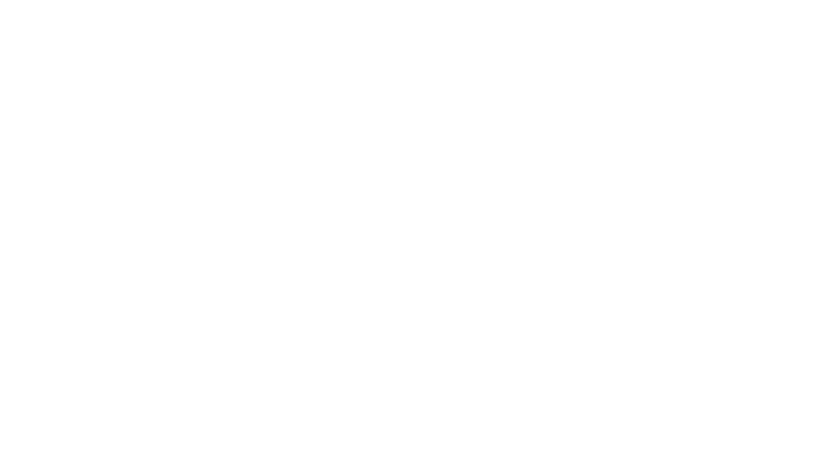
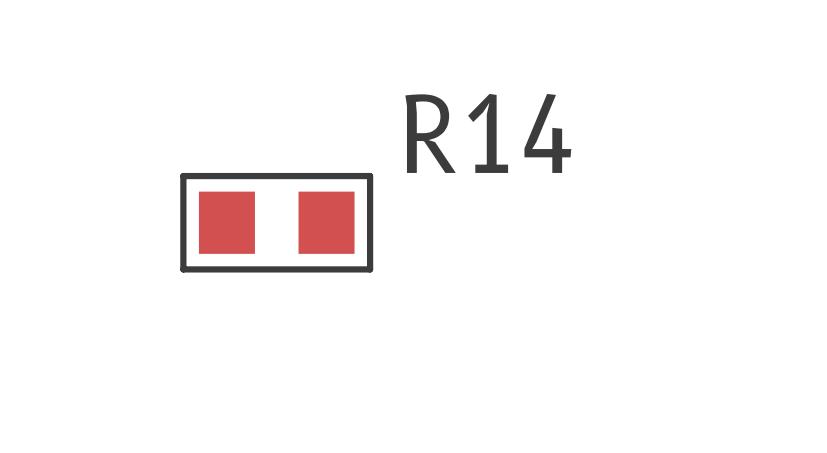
R14: none -> (276, 222)

